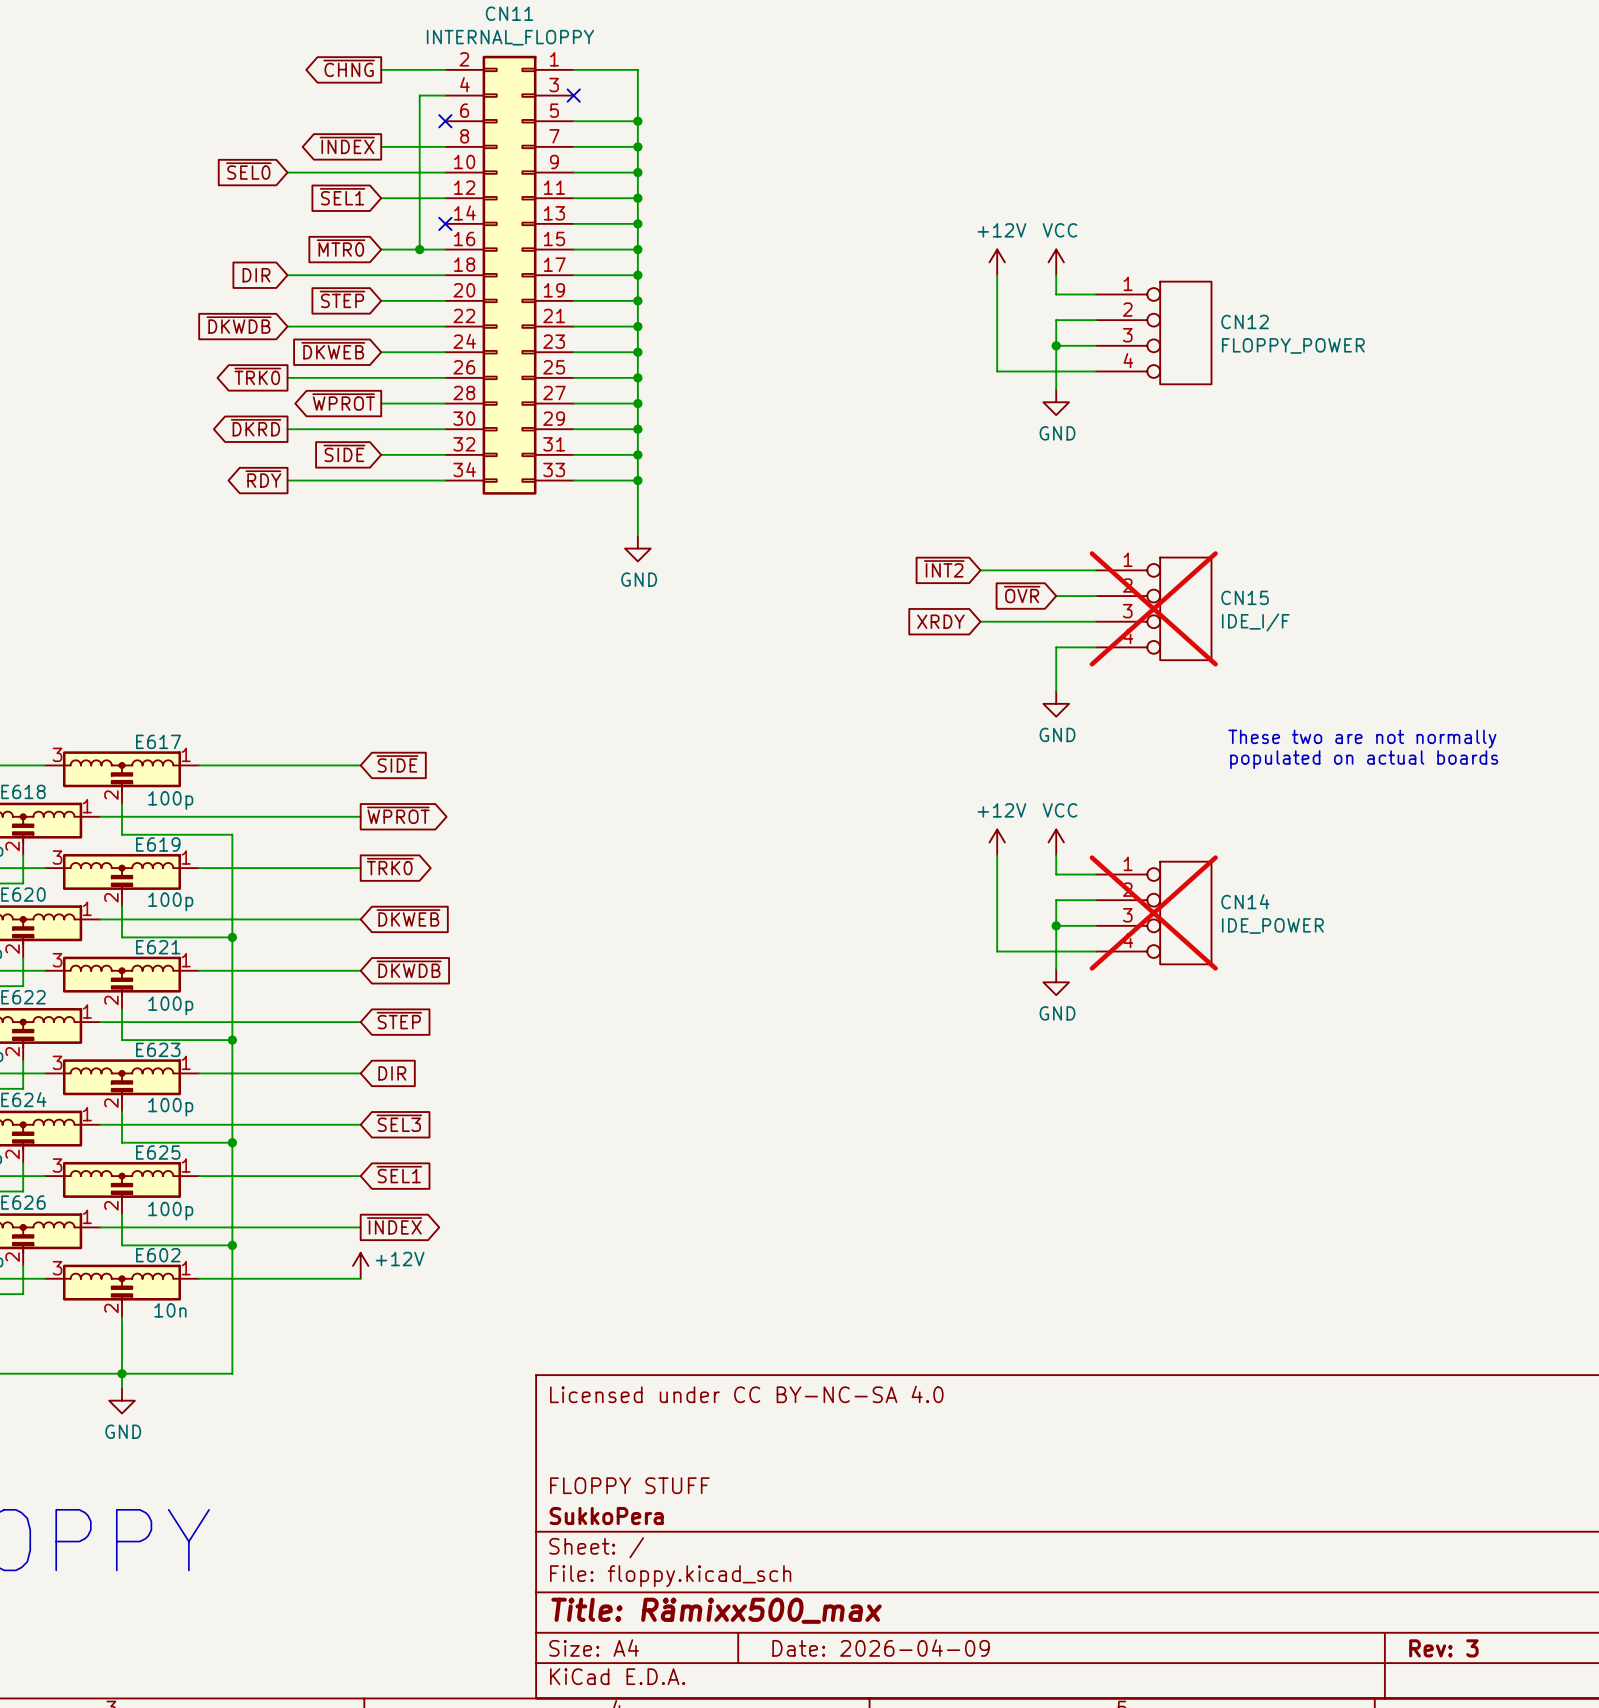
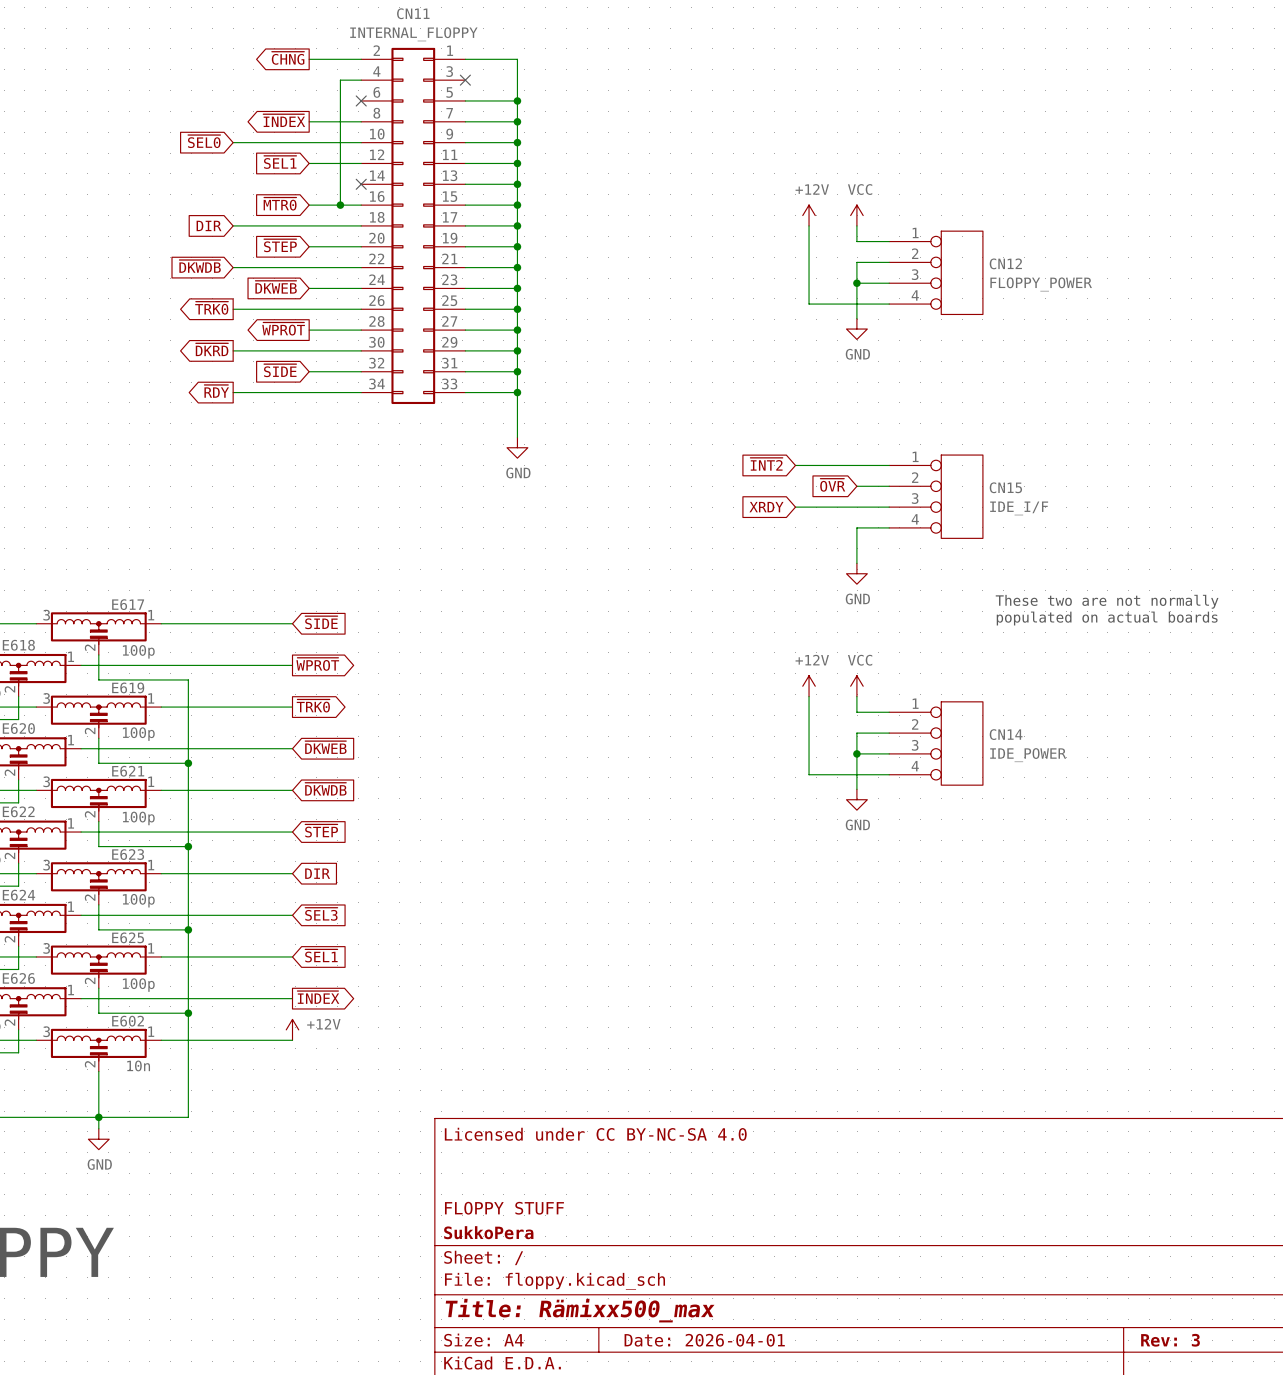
CN15 do-not-place cross: (1153, 608) -> none
CN14 do-not-place cross: (1153, 913) -> none
title block: Date: 2026-04-09 (881, 1648) -> Date: 2026-04-01 (704, 1340)

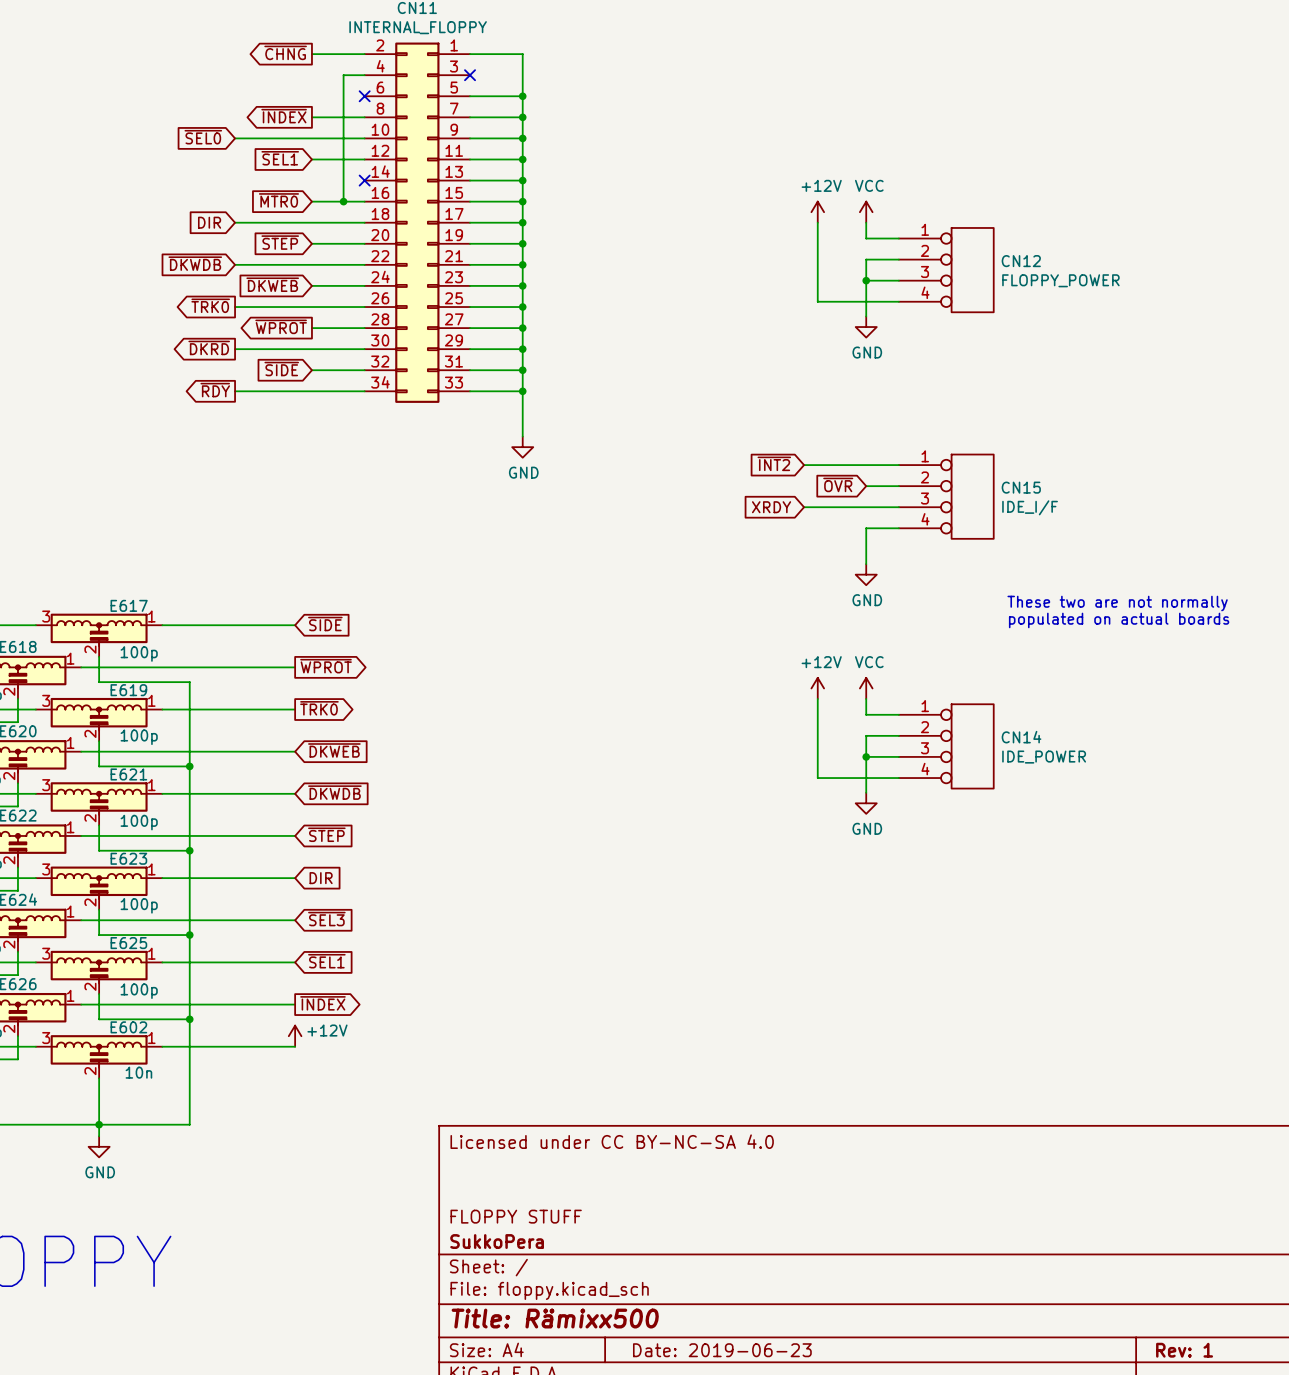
title block: Title: Rämixx500_max (580, 1310) -> Title: Rämixx500 (555, 1318)
title block: Date: 2026-04-01 (704, 1340) -> Date: 2019-06-23 (722, 1350)
title block: Rev: 3 (1170, 1340) -> Rev: 1 (1184, 1350)

